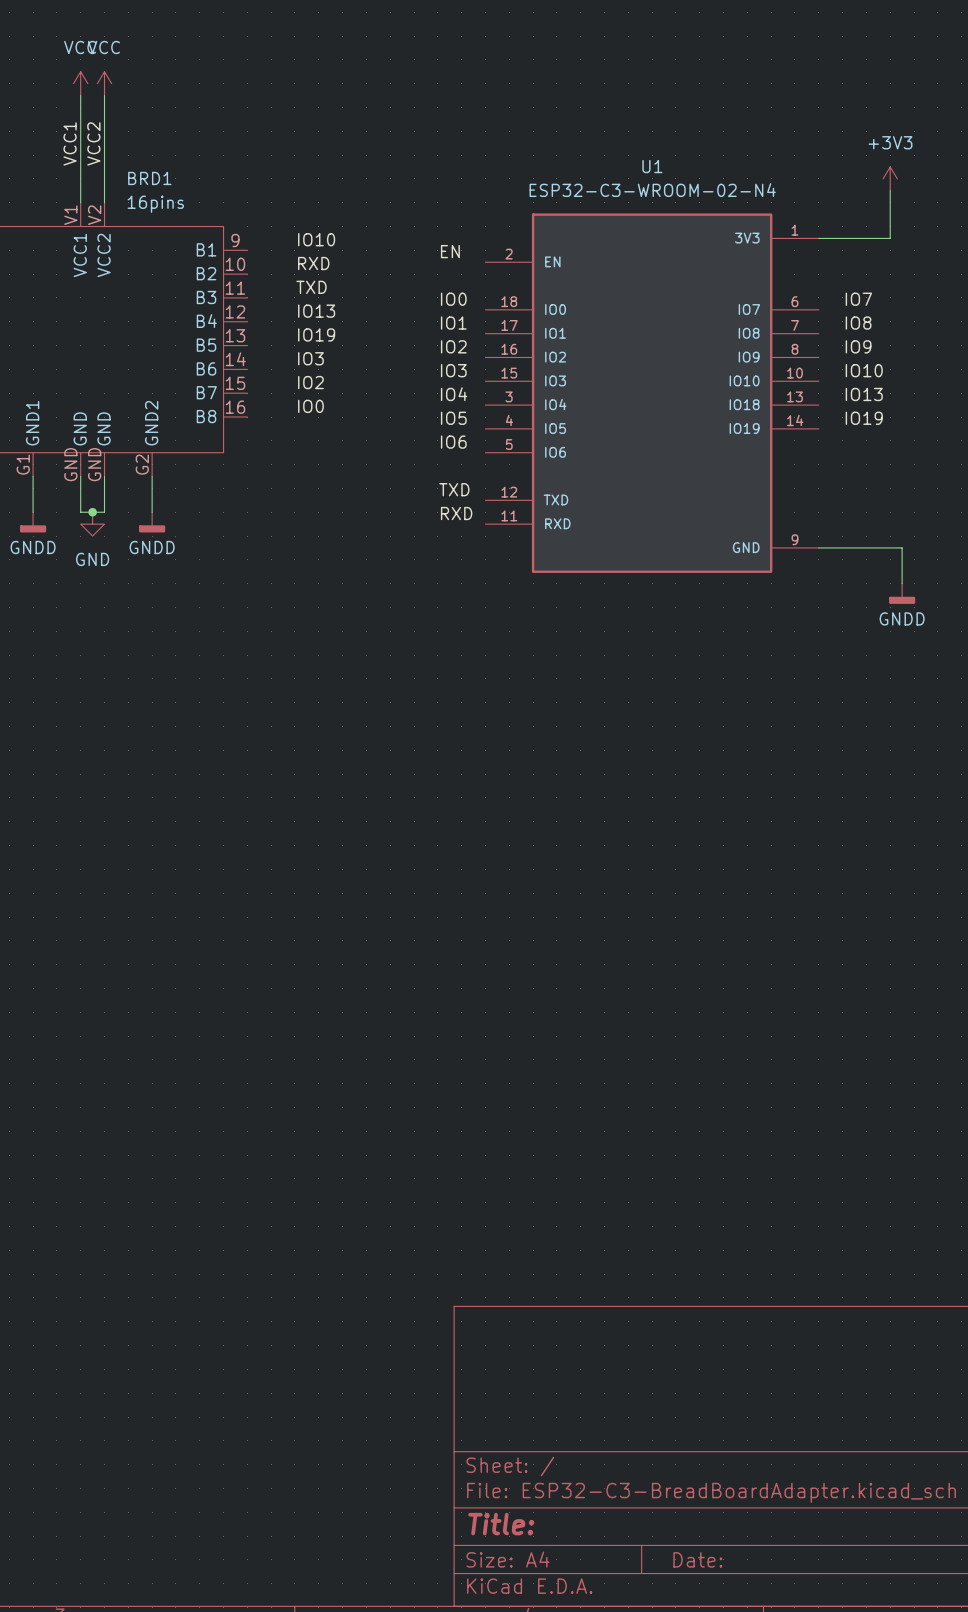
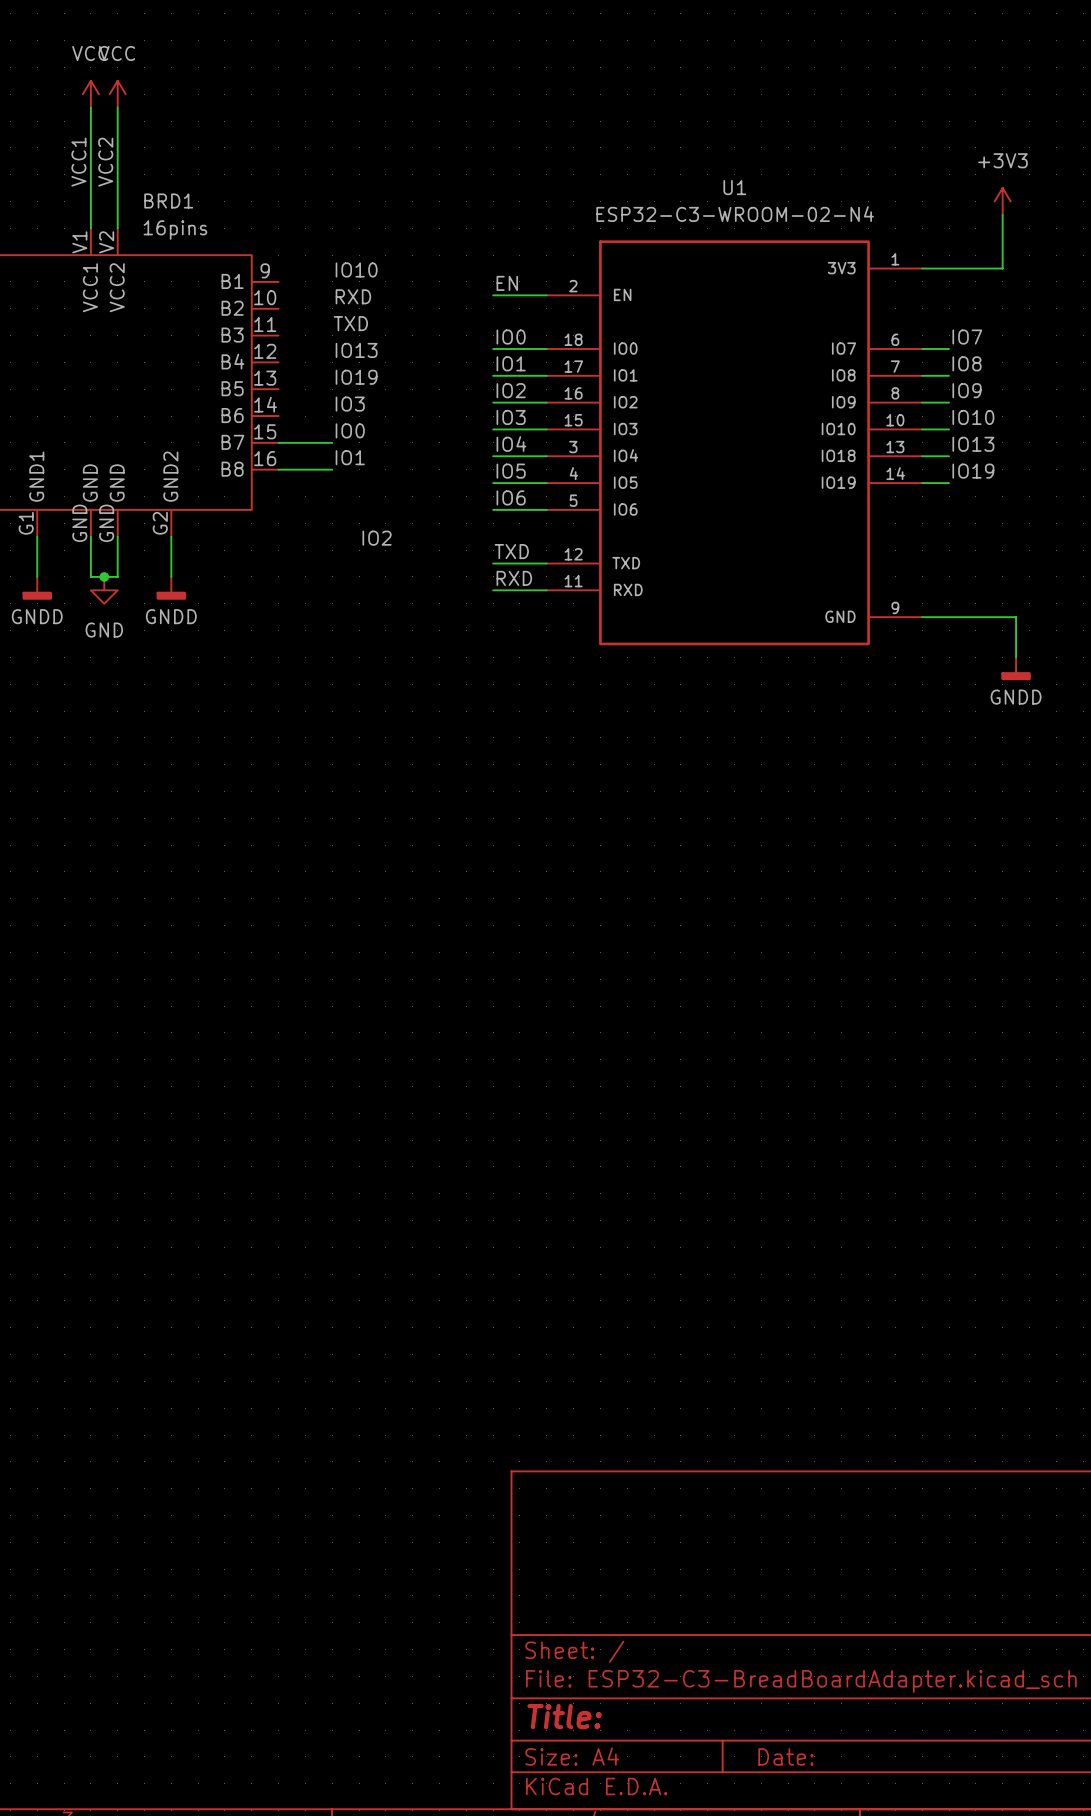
wire: none -> (493, 295) (546, 295)
wire: none -> (493, 348) (546, 348)
wire: none -> (922, 348) (949, 348)
wire: none -> (493, 375) (546, 375)
wire: none -> (922, 375) (949, 375)
wire: none -> (493, 402) (546, 402)
wire: none -> (922, 402) (949, 402)
wire: none -> (493, 429) (546, 429)
wire: none -> (922, 429) (949, 429)
label: IO2 (310, 382) -> IO0 (350, 430)
wire: none -> (278, 442) (332, 442)
wire: none -> (493, 456) (546, 456)
wire: none -> (922, 456) (949, 456)
label: IO0 (310, 406) -> IO1 (350, 457)
wire: none -> (278, 469) (332, 469)
wire: none -> (493, 483) (546, 483)
wire: none -> (922, 483) (949, 483)
wire: none -> (493, 509) (546, 509)
label: none -> IO2 (377, 538)
wire: none -> (493, 563) (546, 563)
wire: none -> (493, 590) (546, 590)

